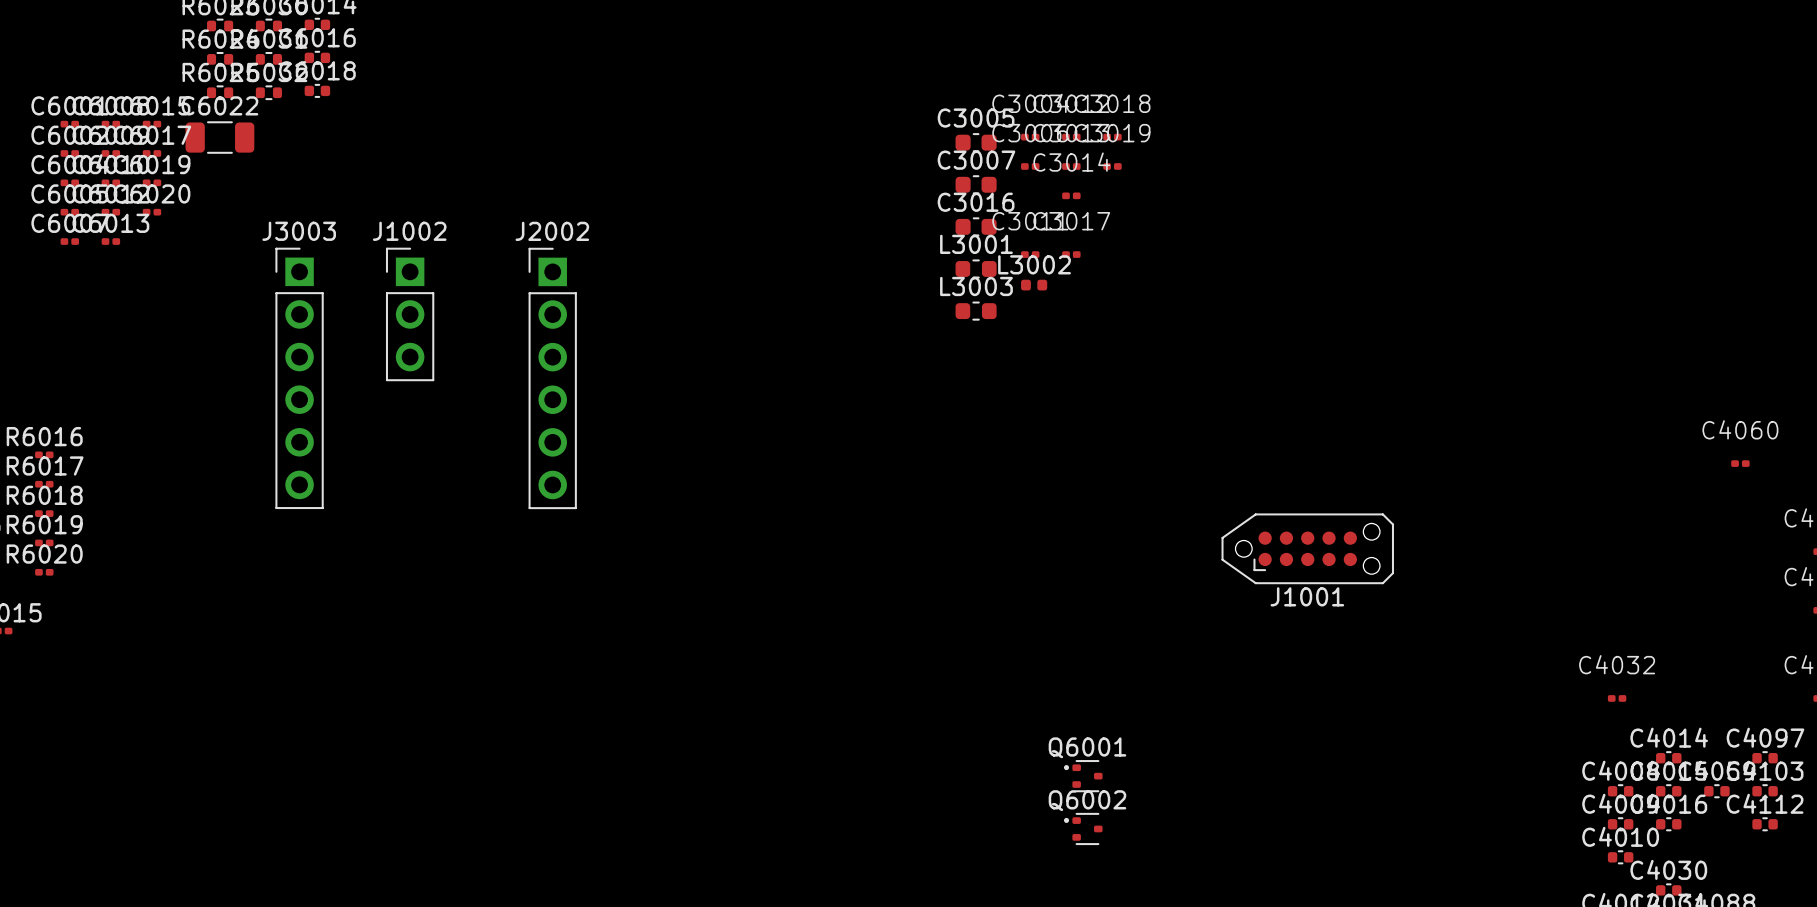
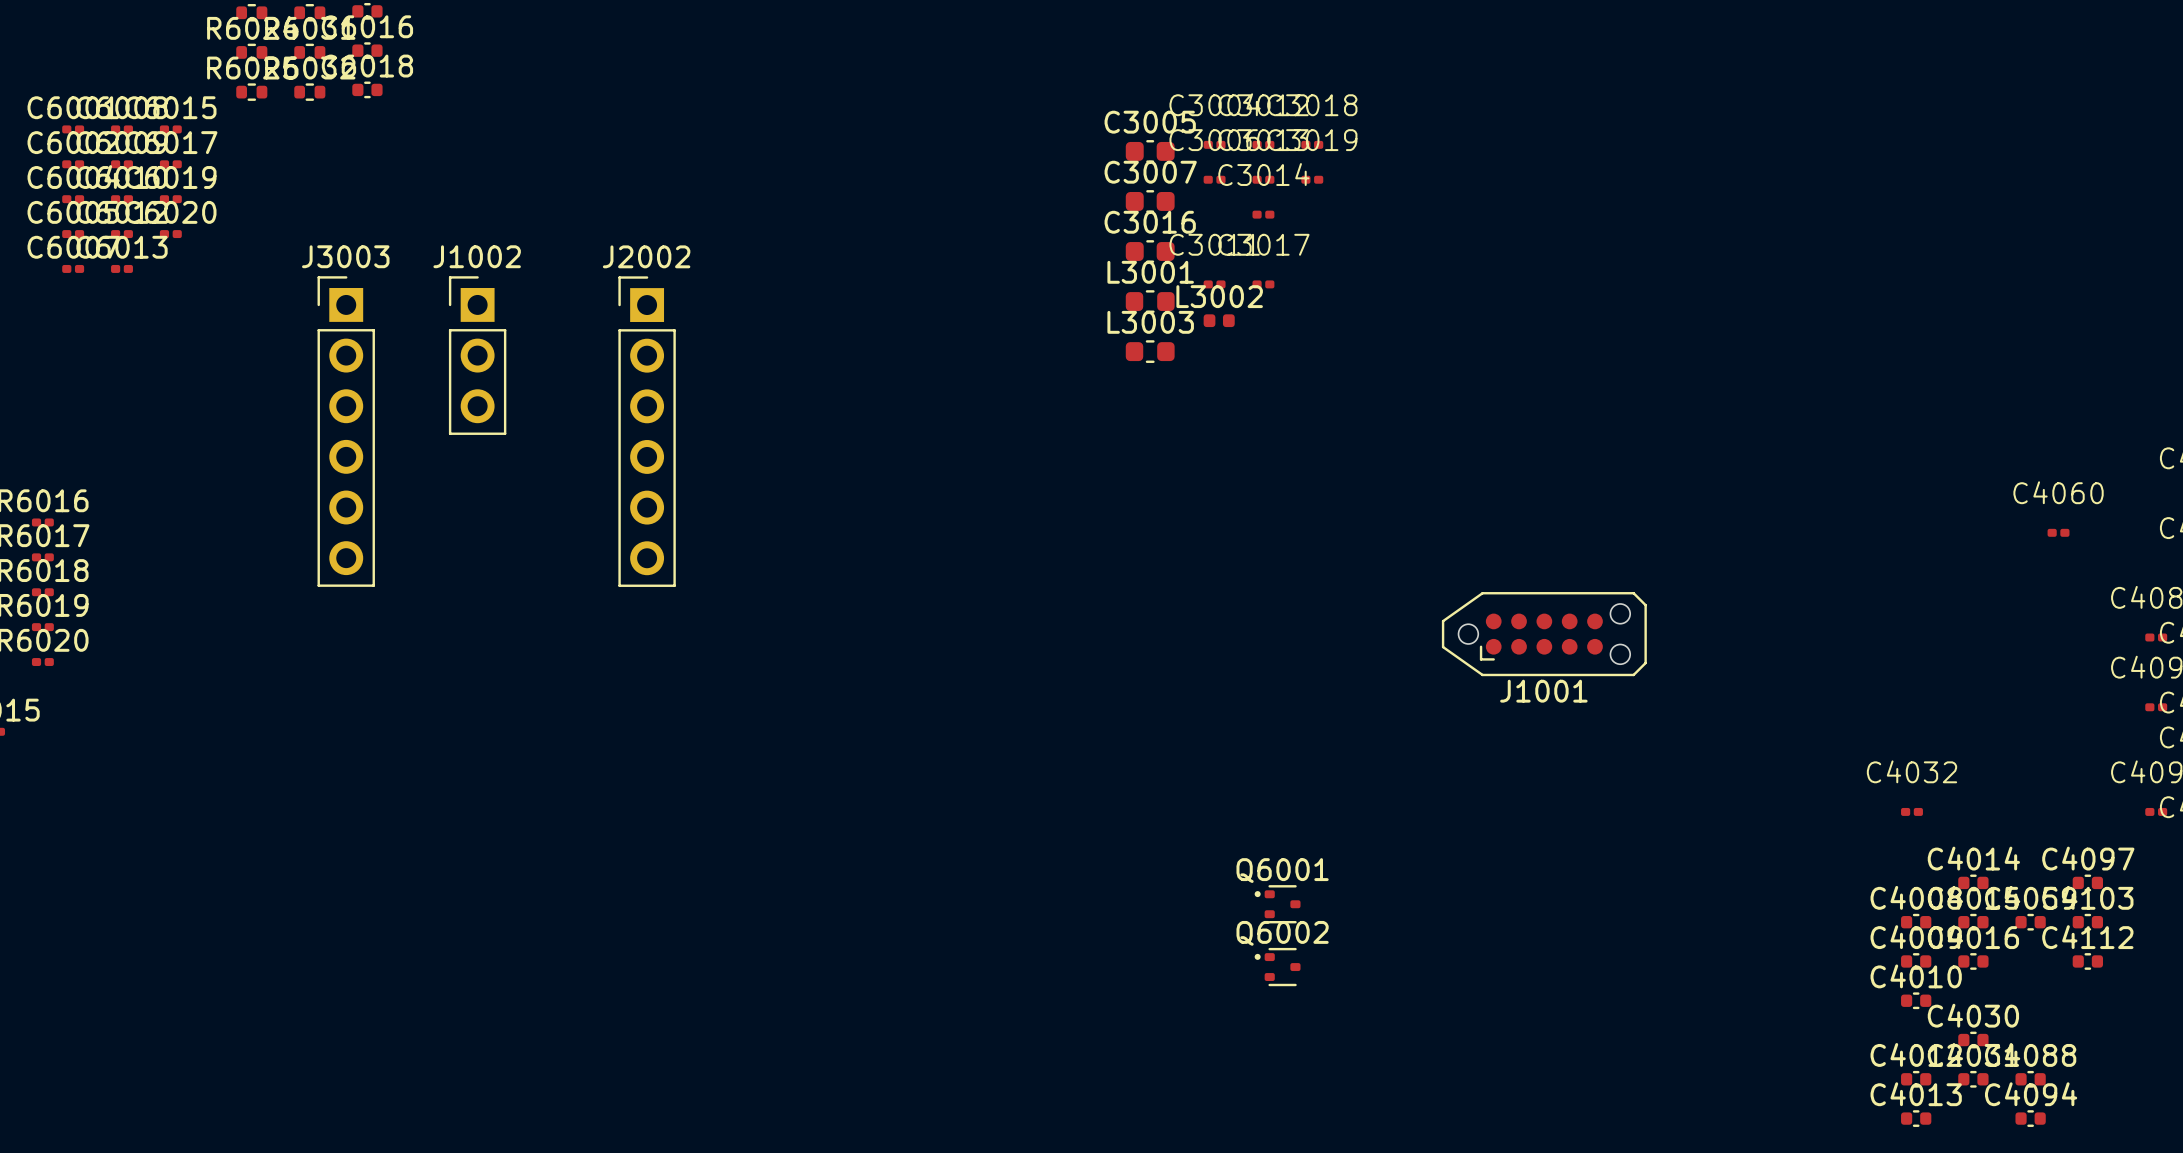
C6022: (219, 137) -> none

